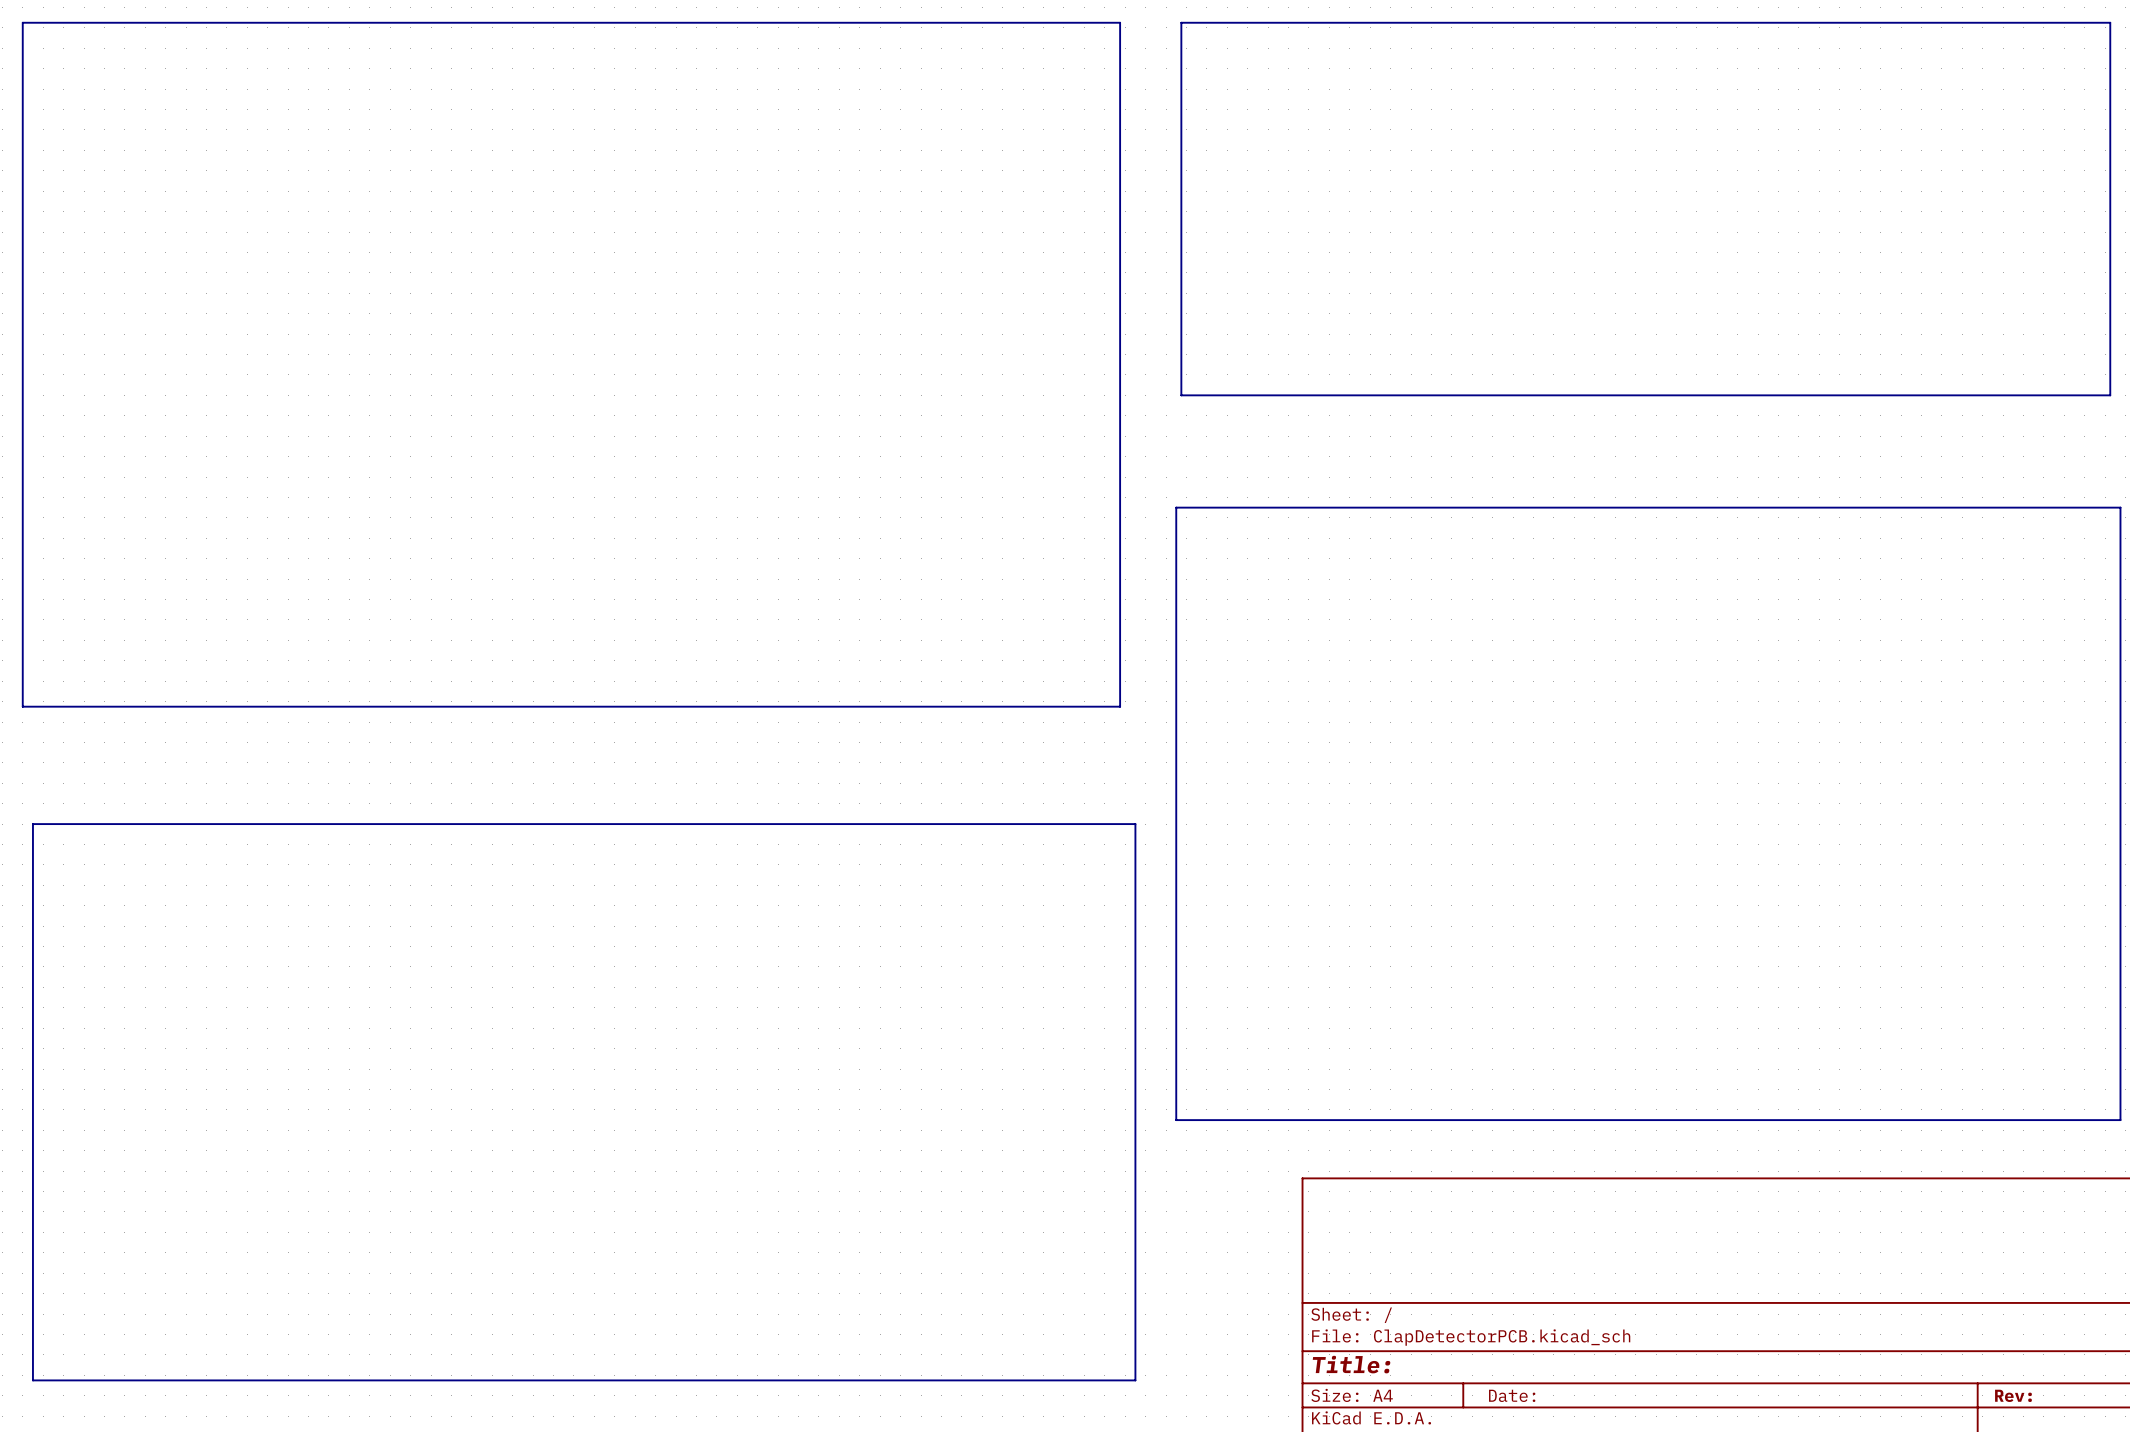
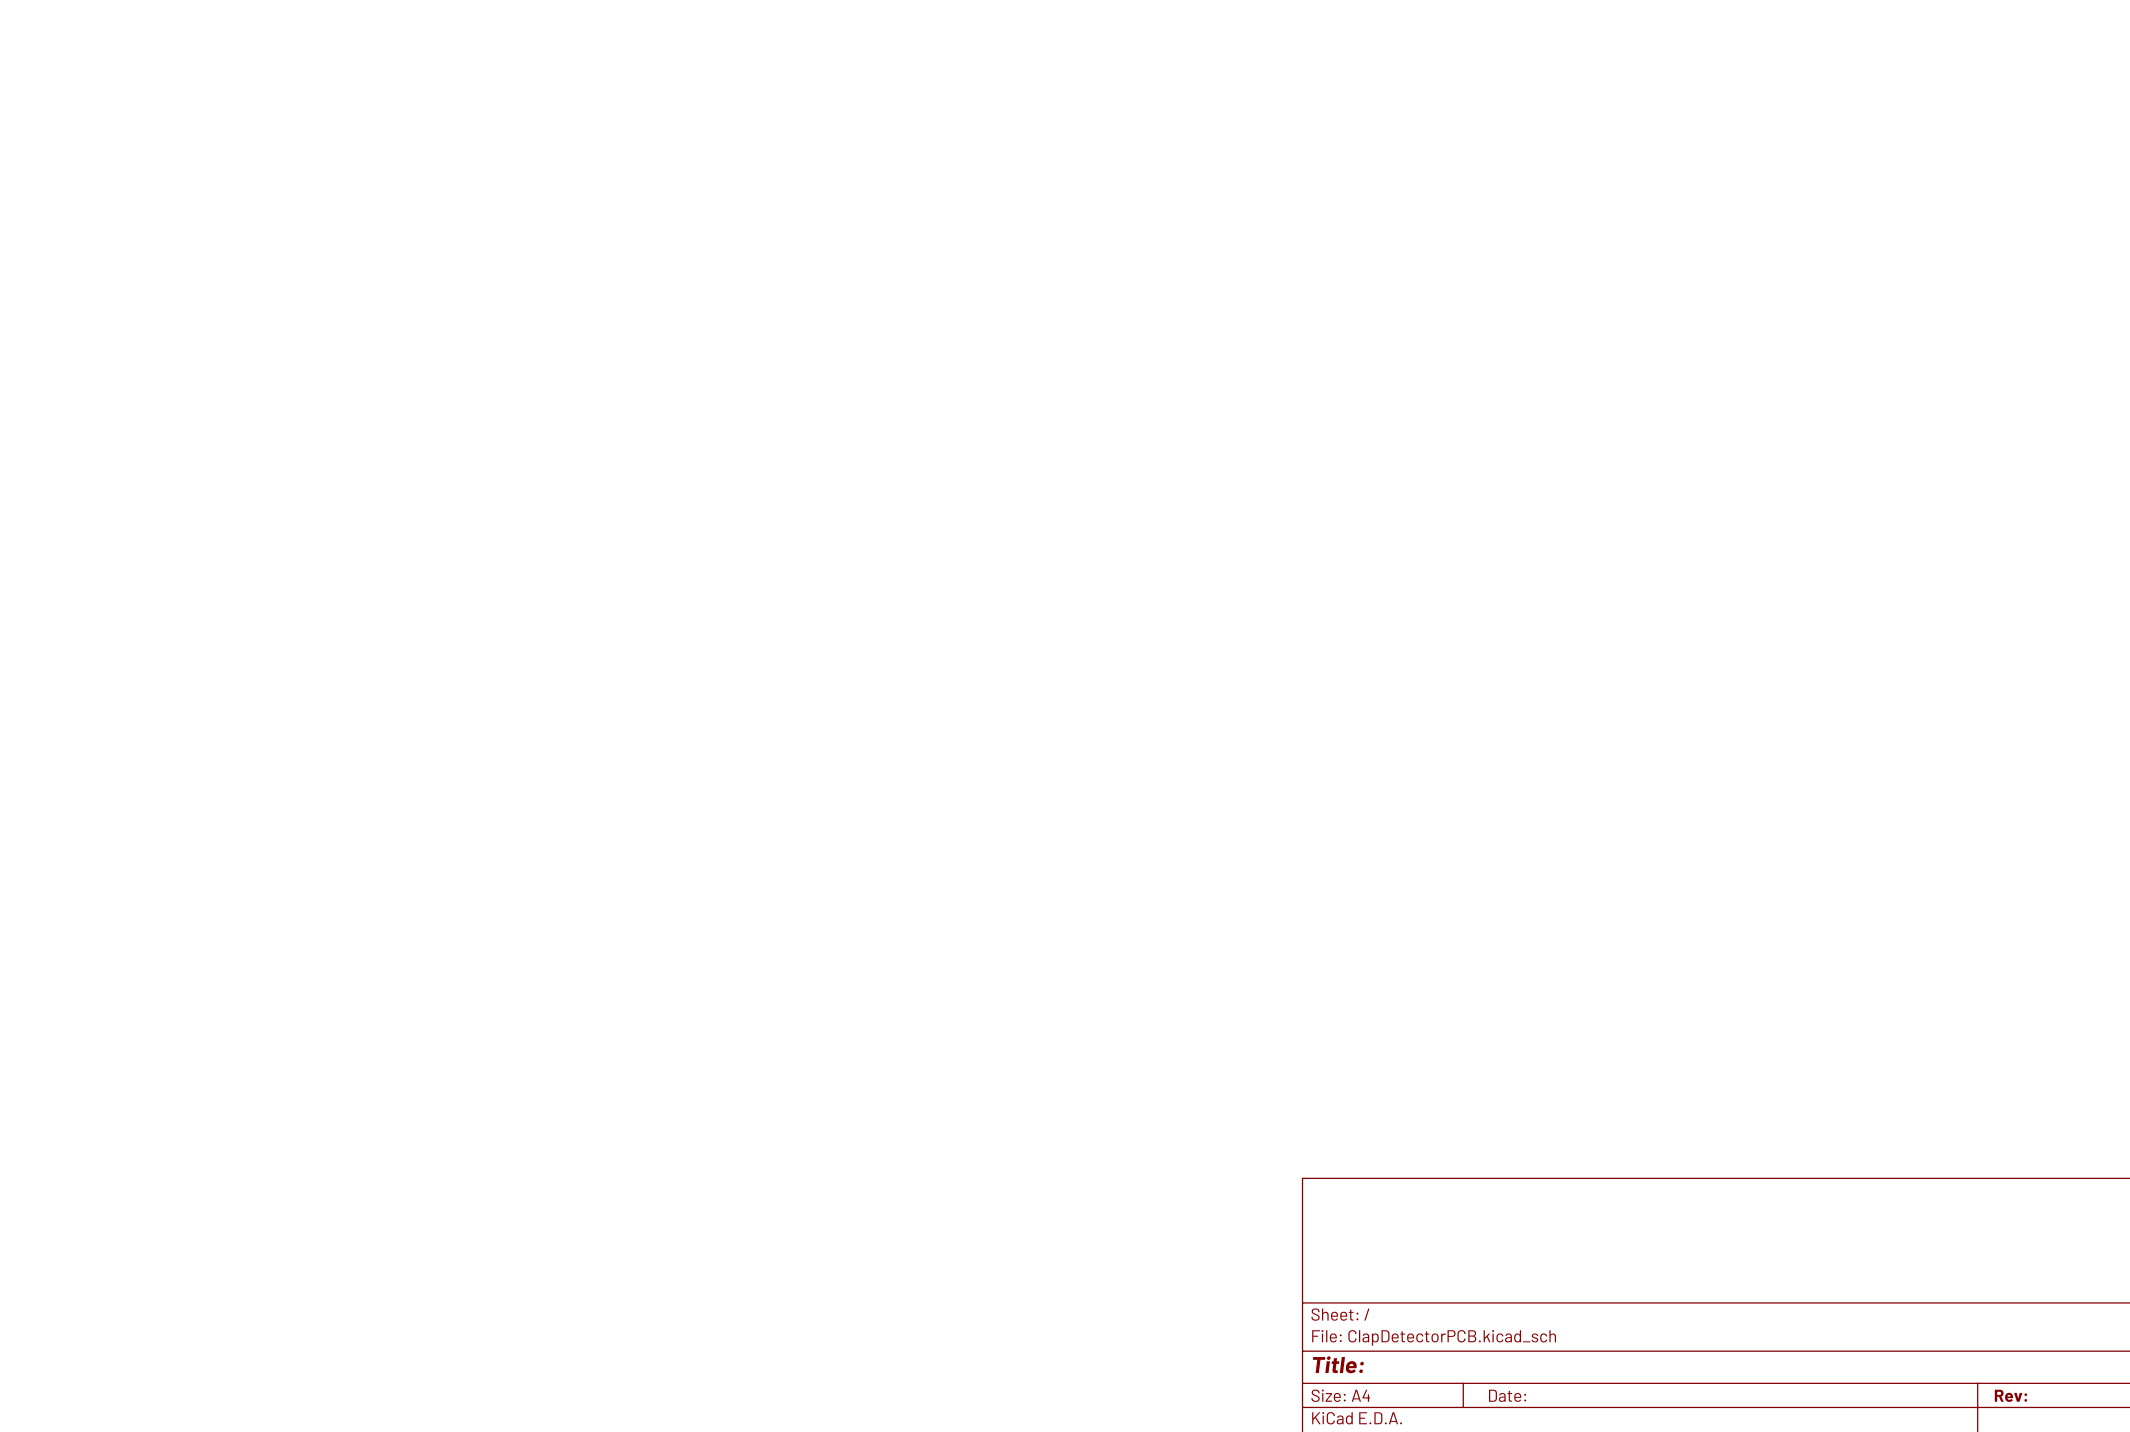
line: (22, 22) (1120, 22) (1120, 706) (22, 706) (22, 22) -> none
line: (1181, 22) (2110, 22) (2110, 395) (1181, 395) (1181, 22) -> none
line: (1176, 507) (2120, 507) (2120, 1120) (1176, 1120) (1176, 507) -> none
line: (32, 824) (1135, 824) (1135, 1380) (32, 1380) (32, 824) -> none

